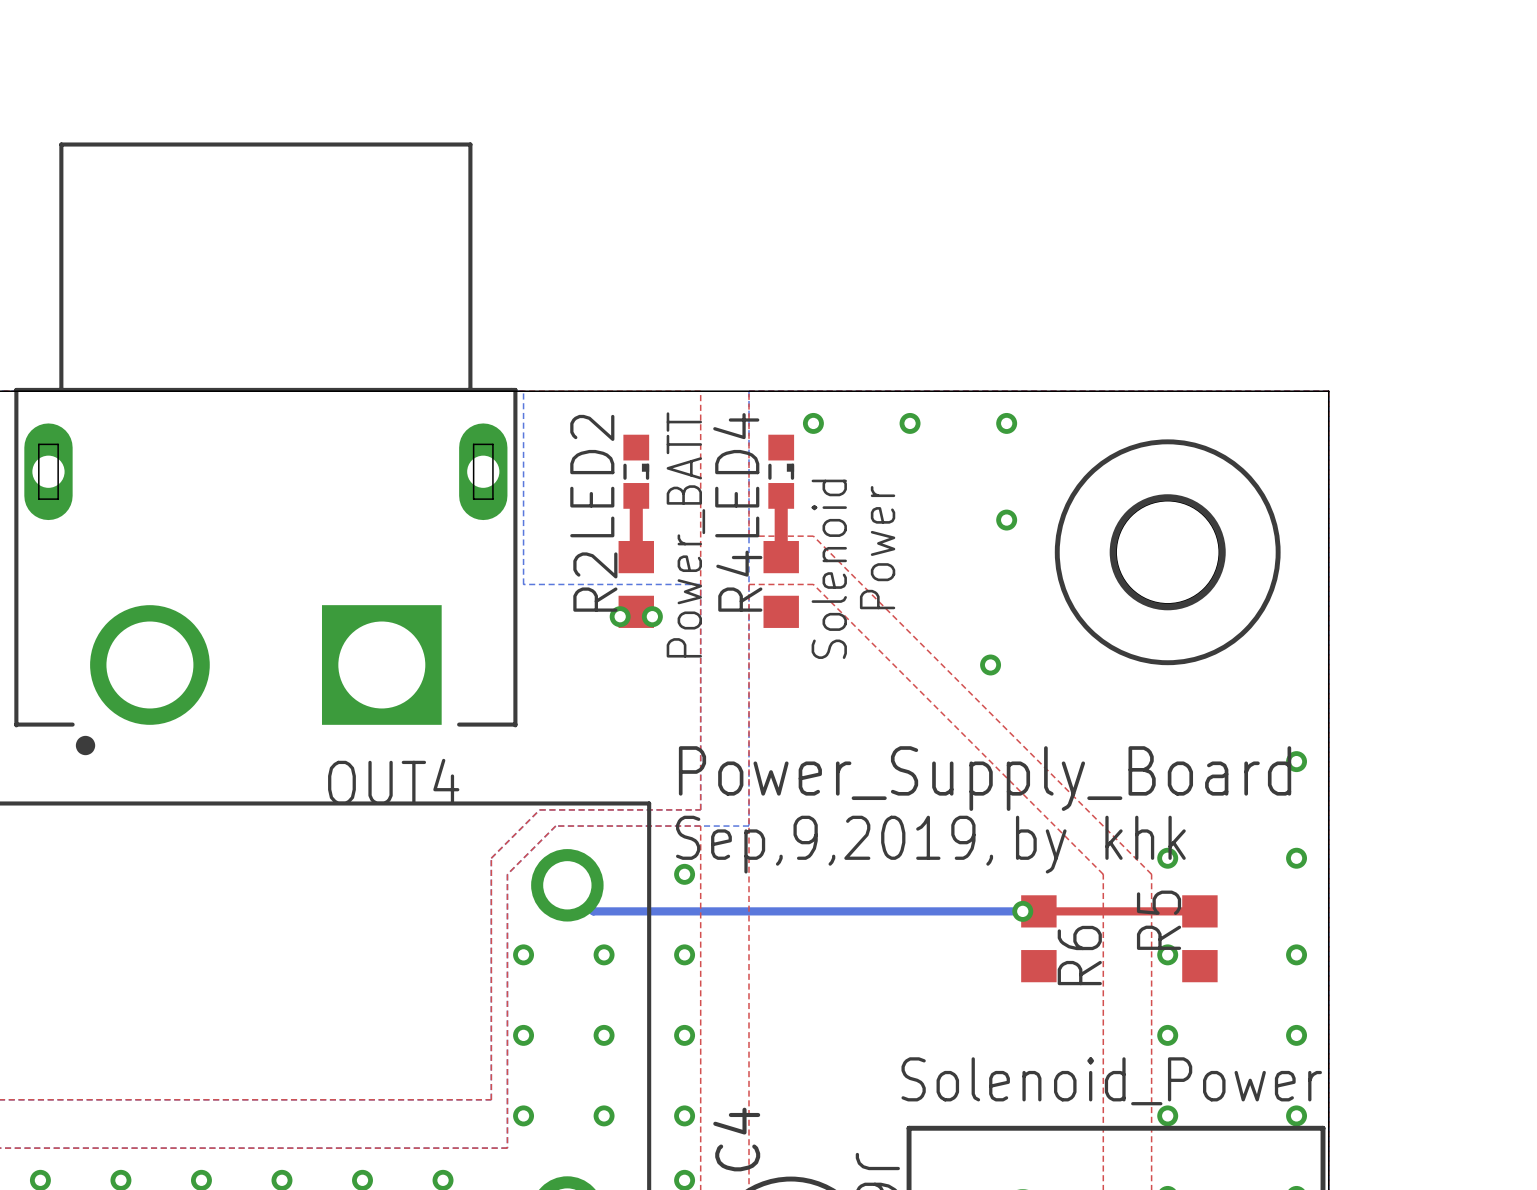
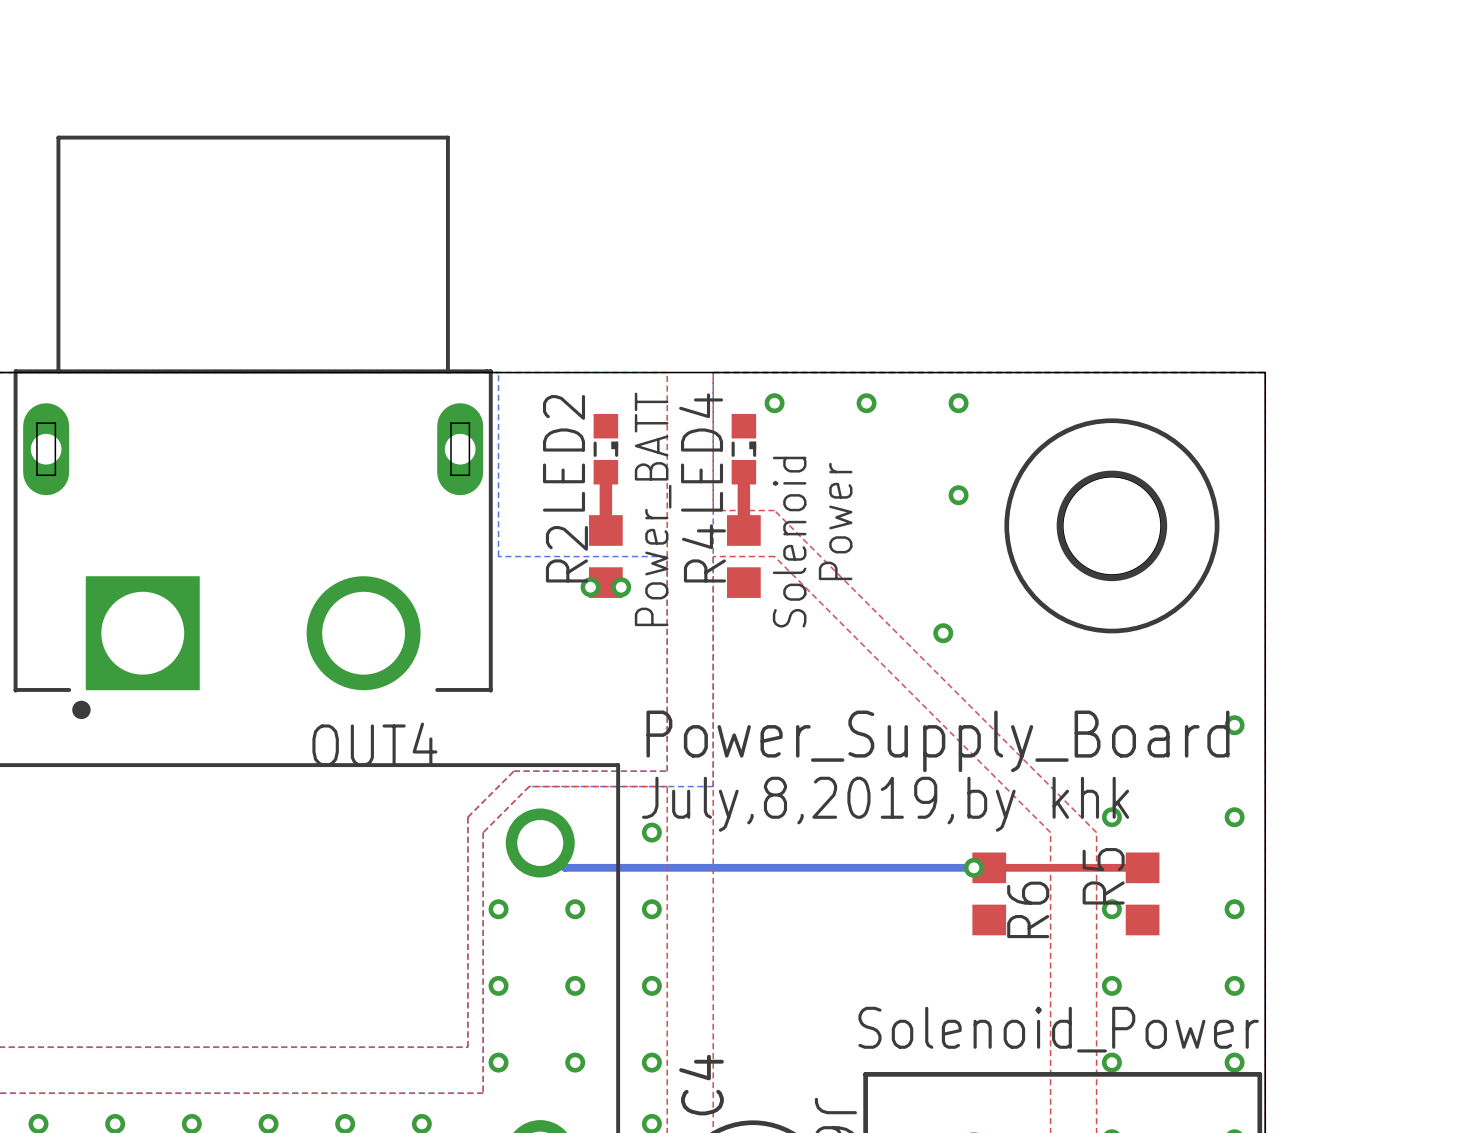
OUT4 footprint: [14, 142, 518, 756] -> [13, 135, 493, 720]
text: Sep,9,2019, (834, 844) -> July,8,2019, (798, 804)

